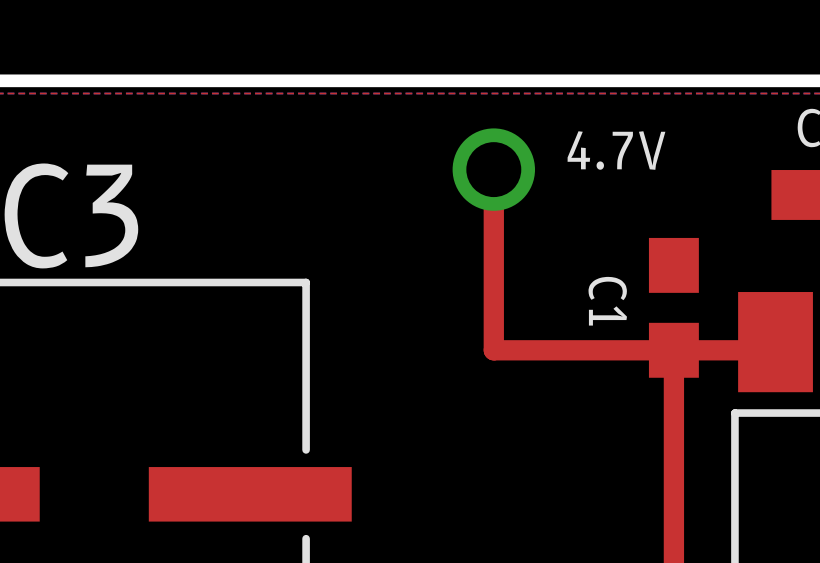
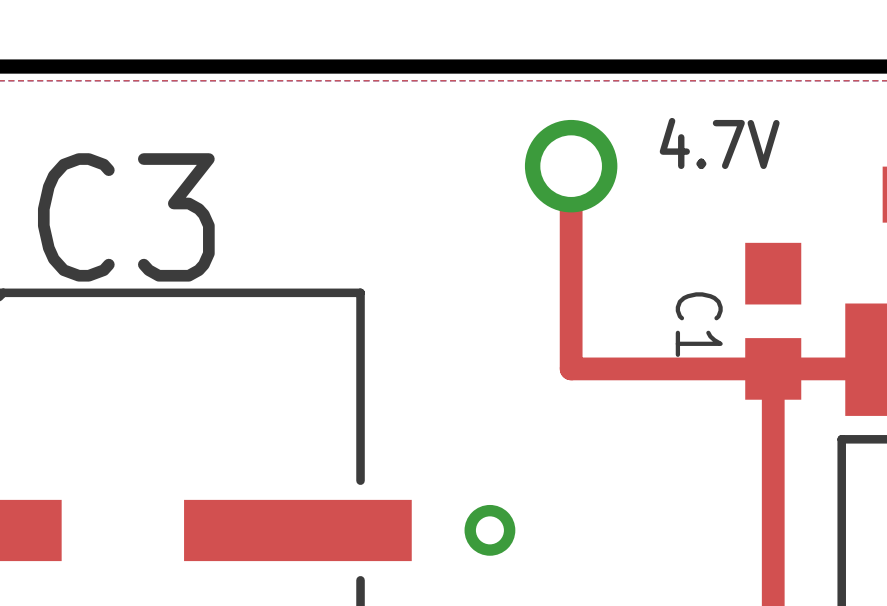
via: none -> (489, 530)

